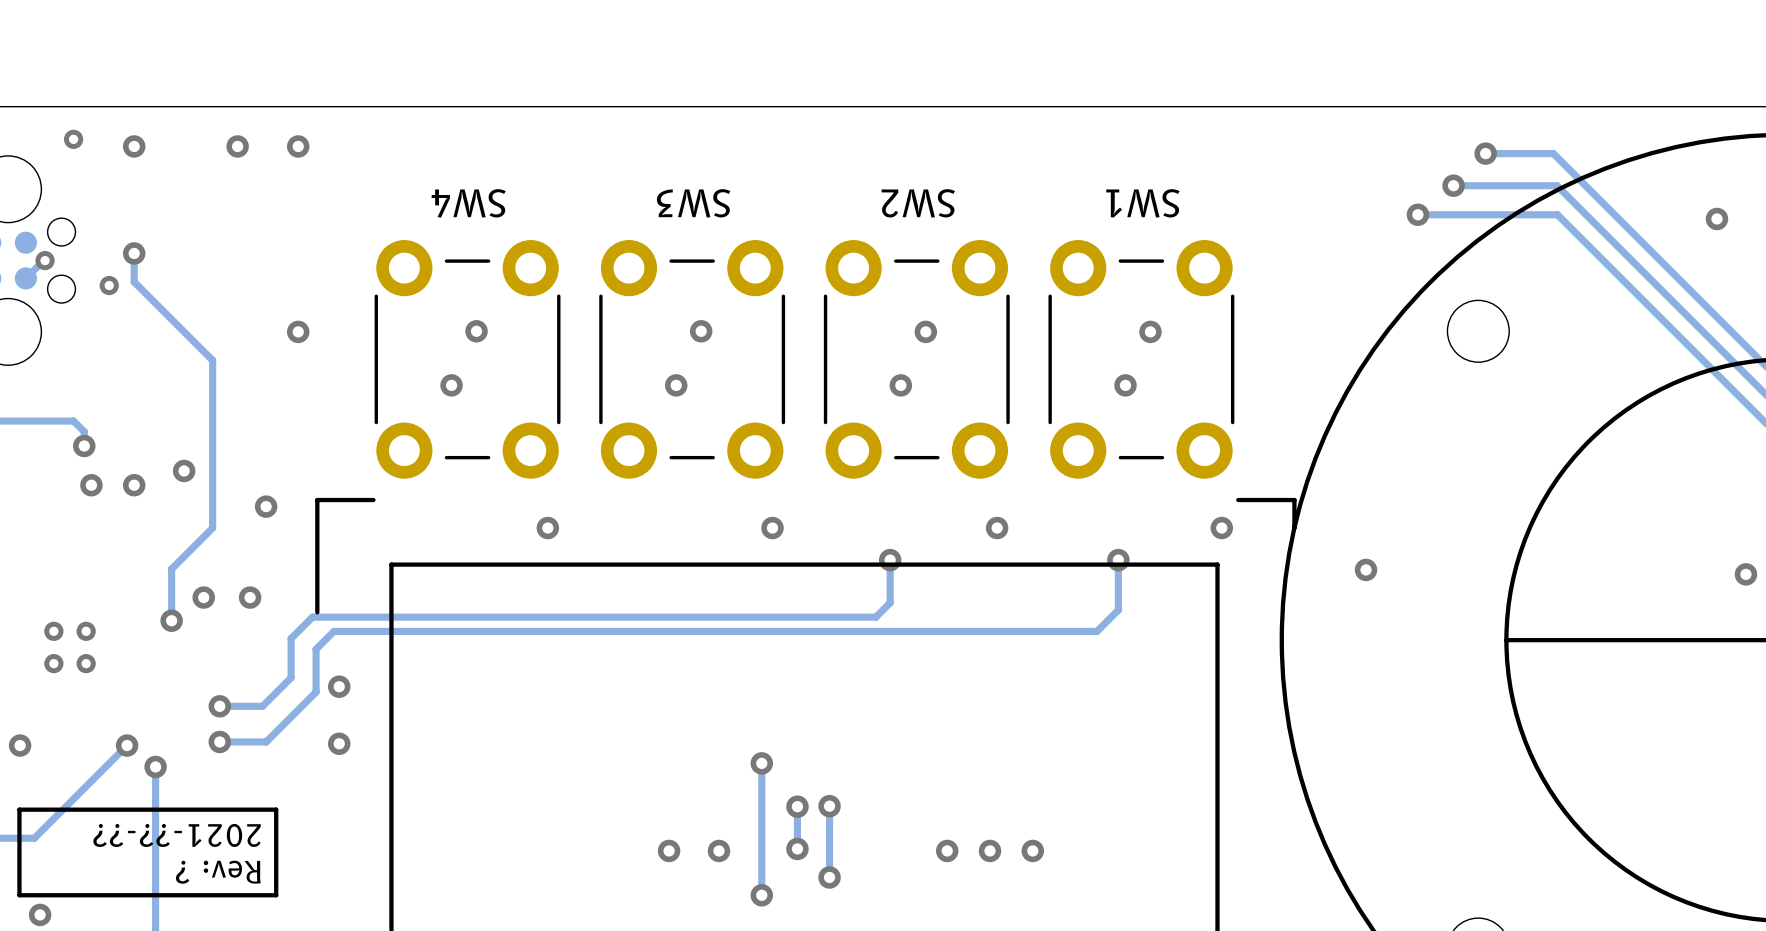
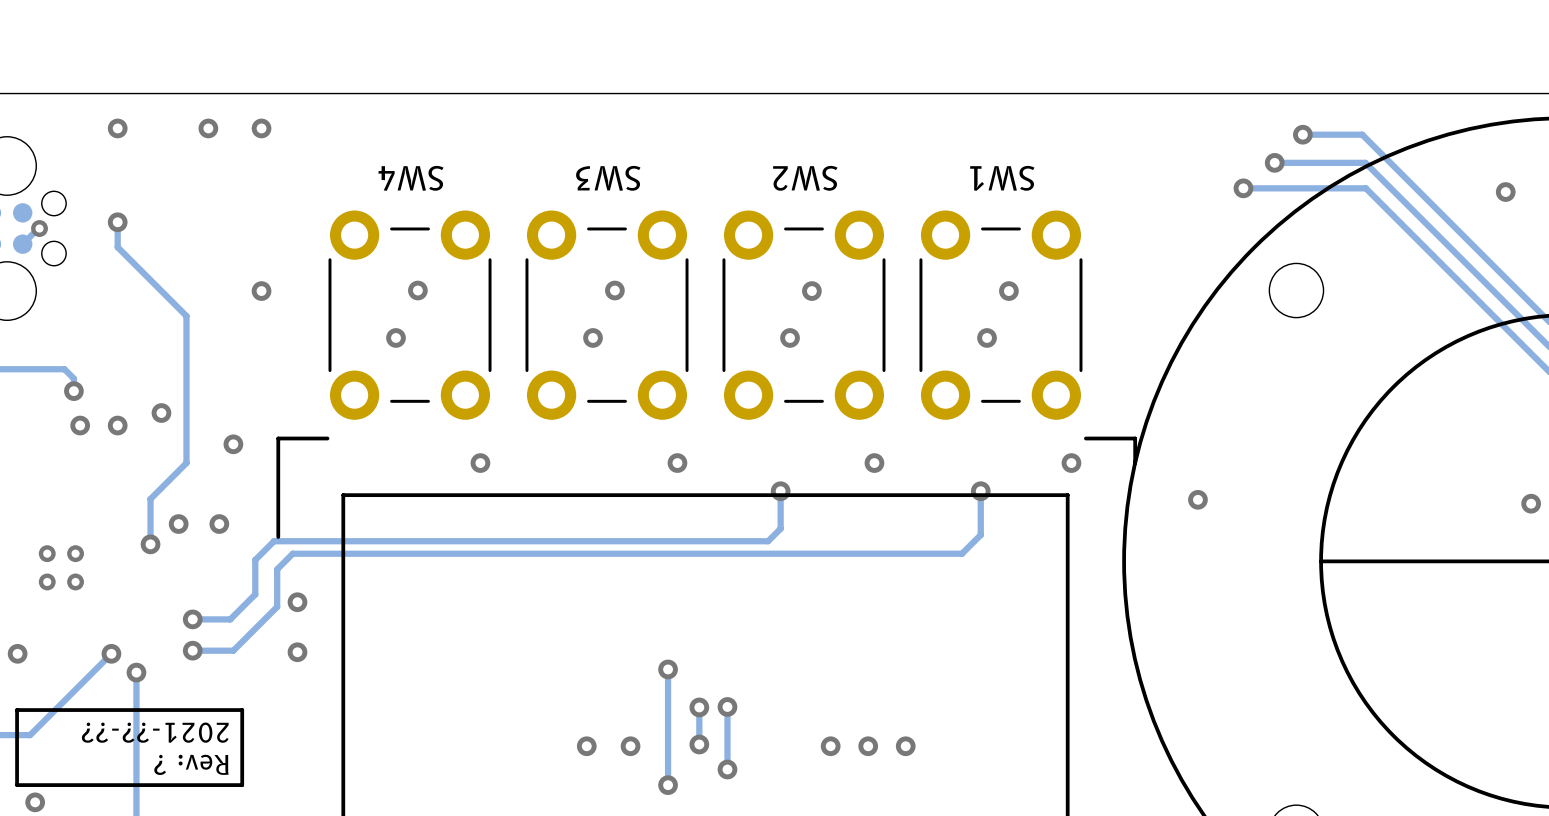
via: (73, 139) -> none
via: (109, 285) -> none

